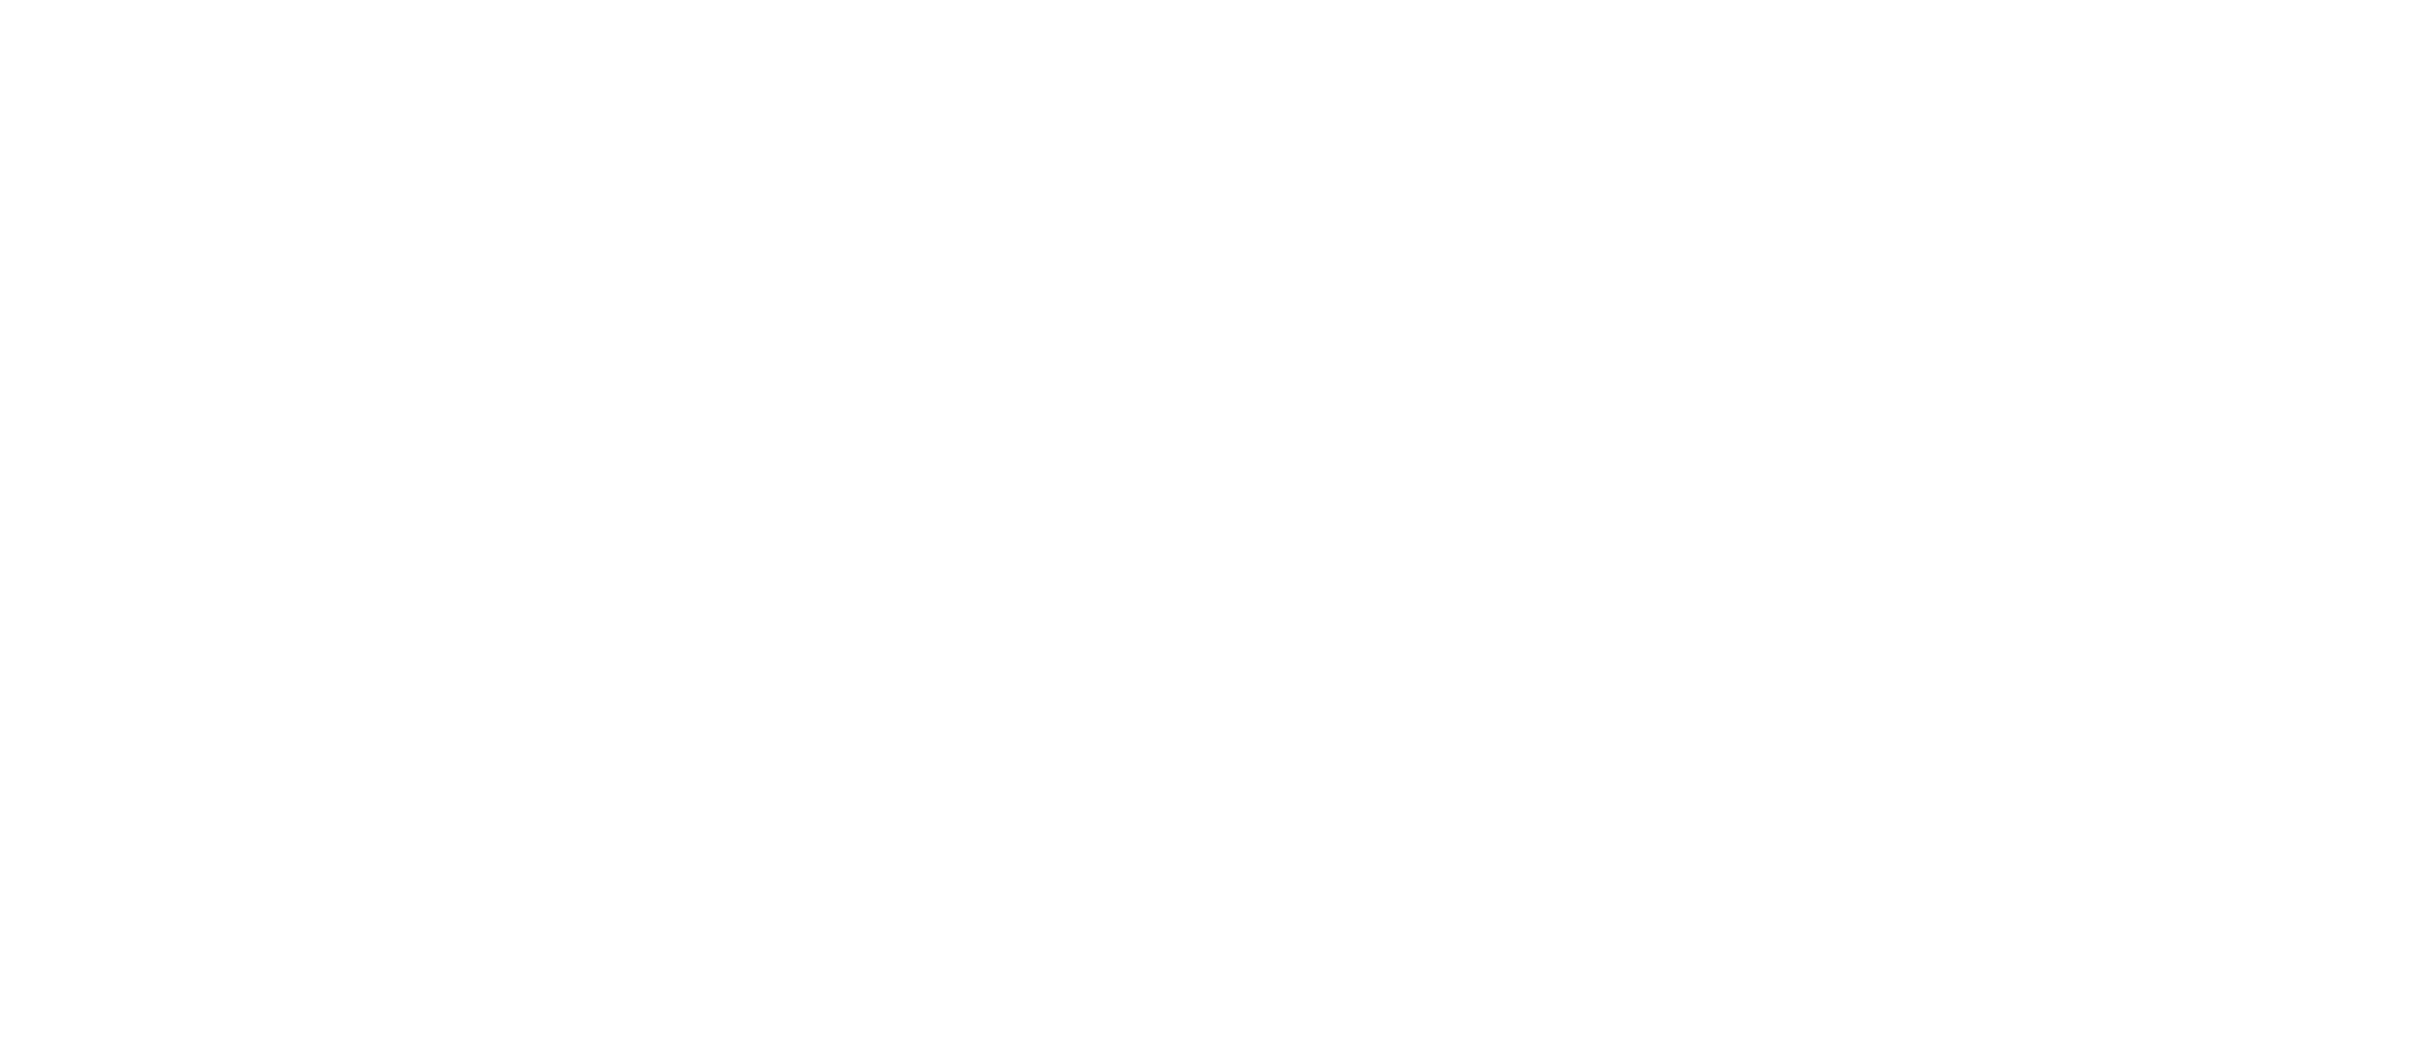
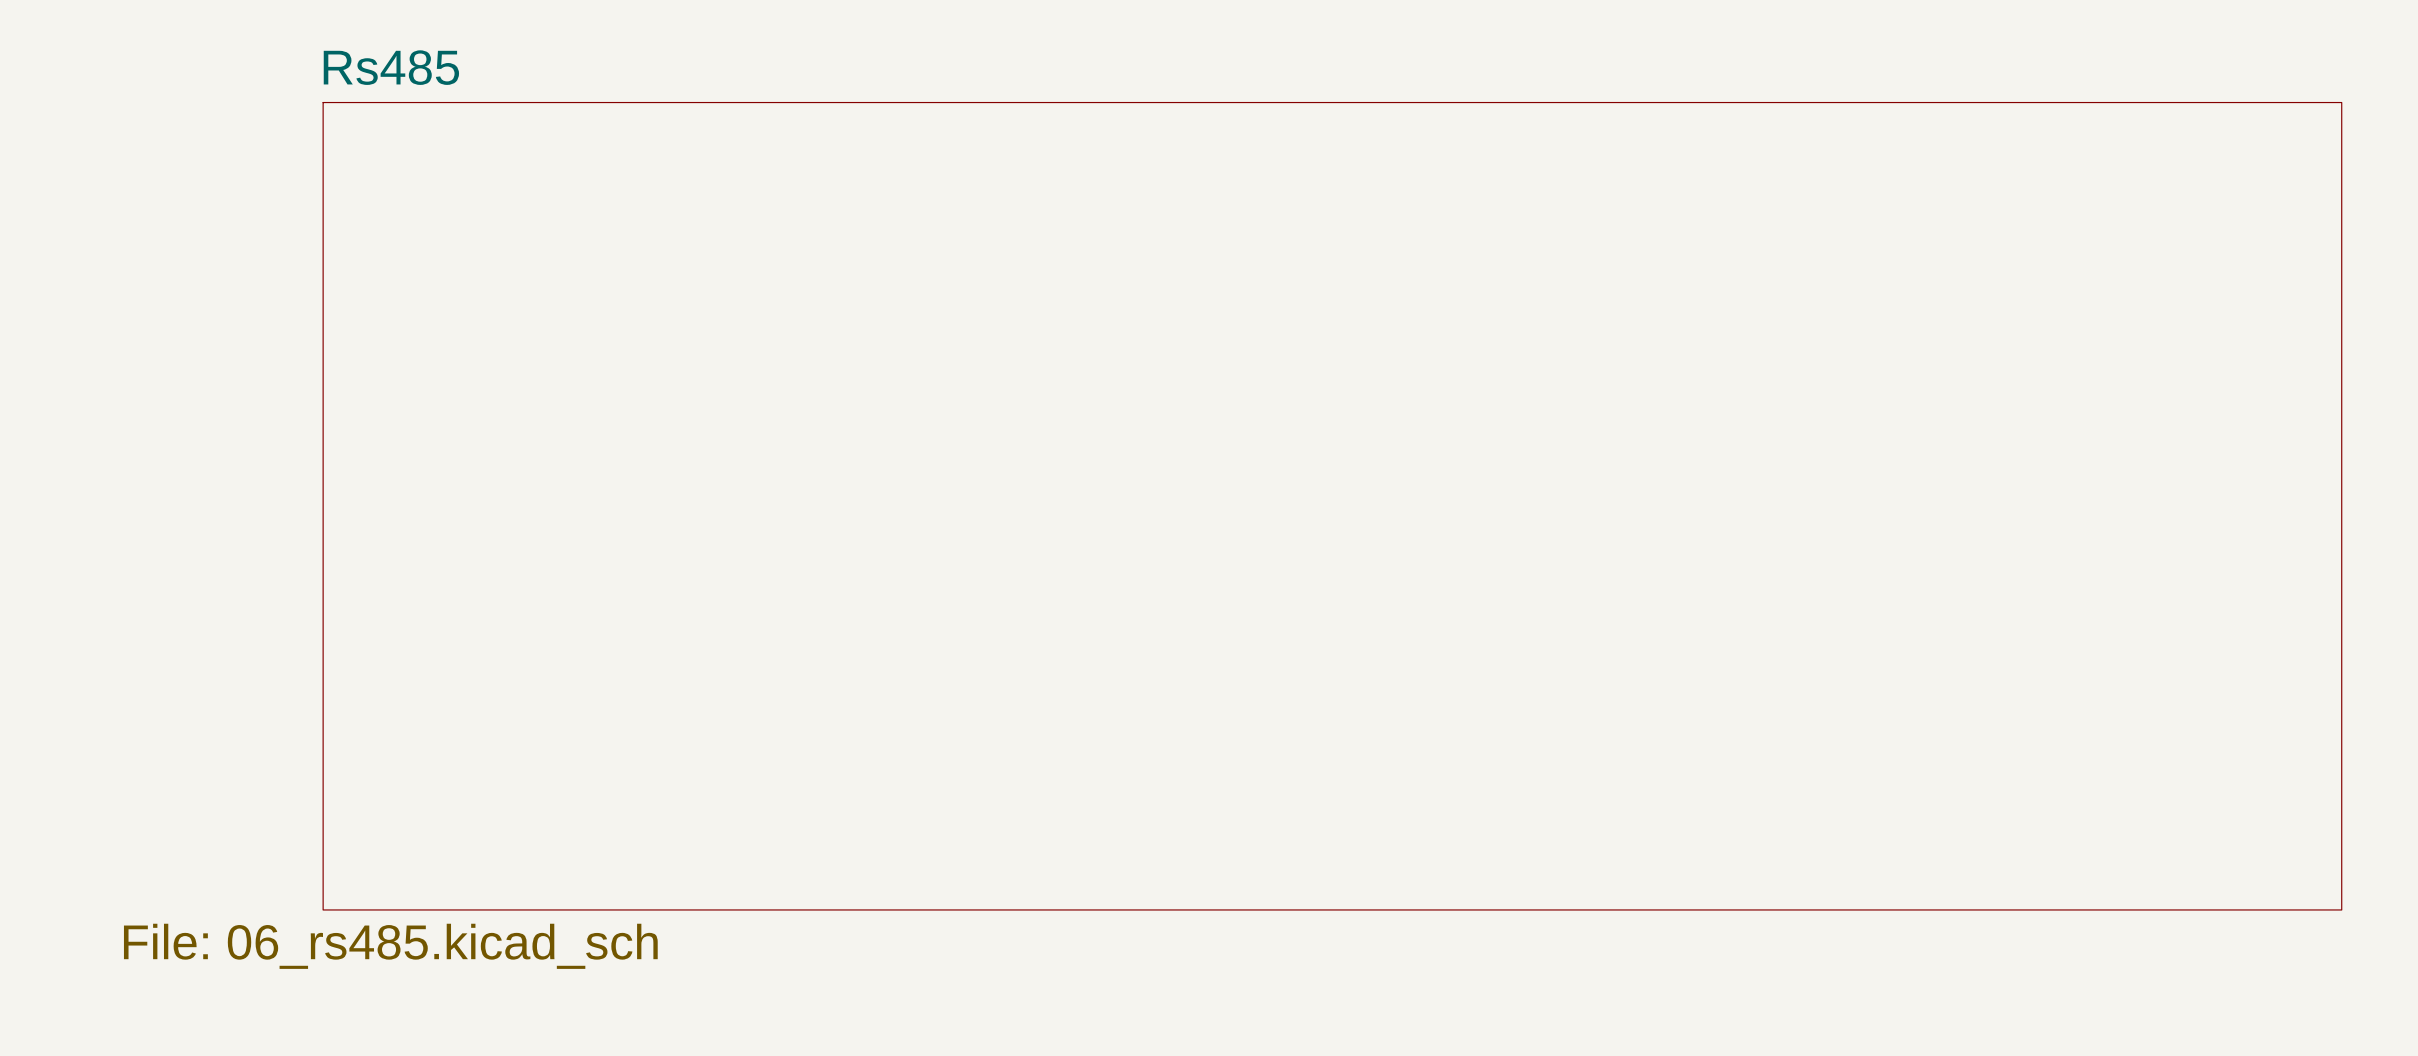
sheet Rs485: none -> File: 06_rs485.kicad_sch (1332, 506)

